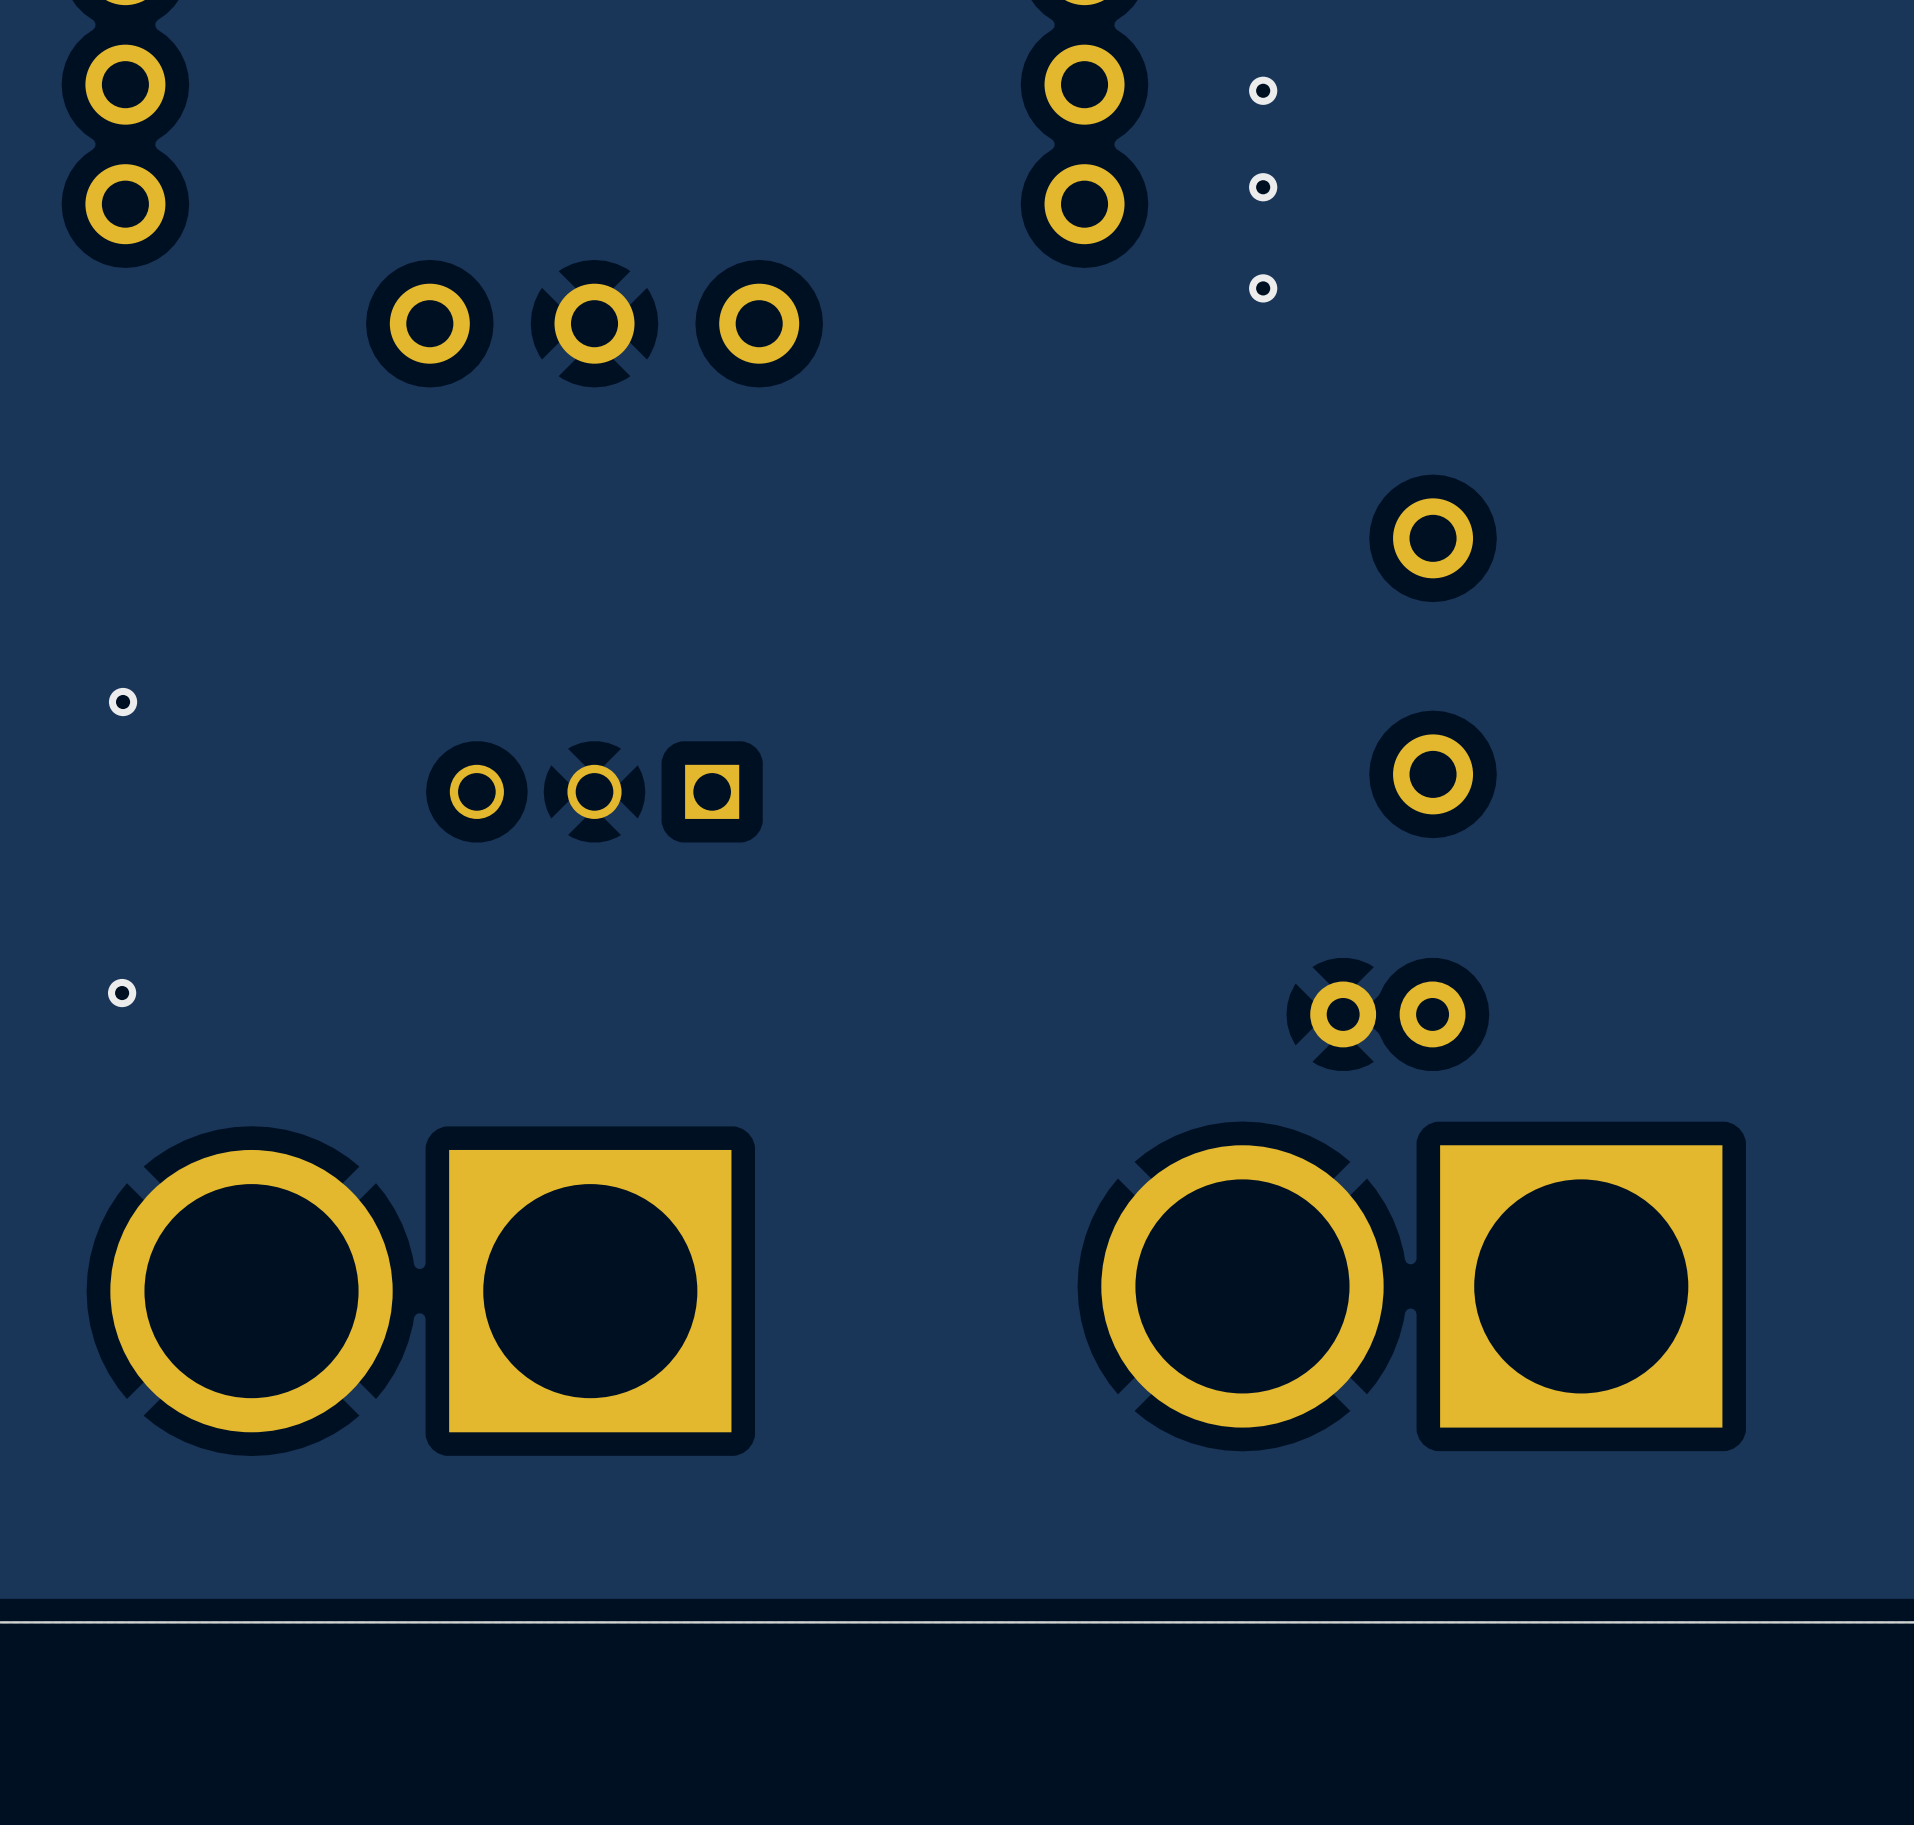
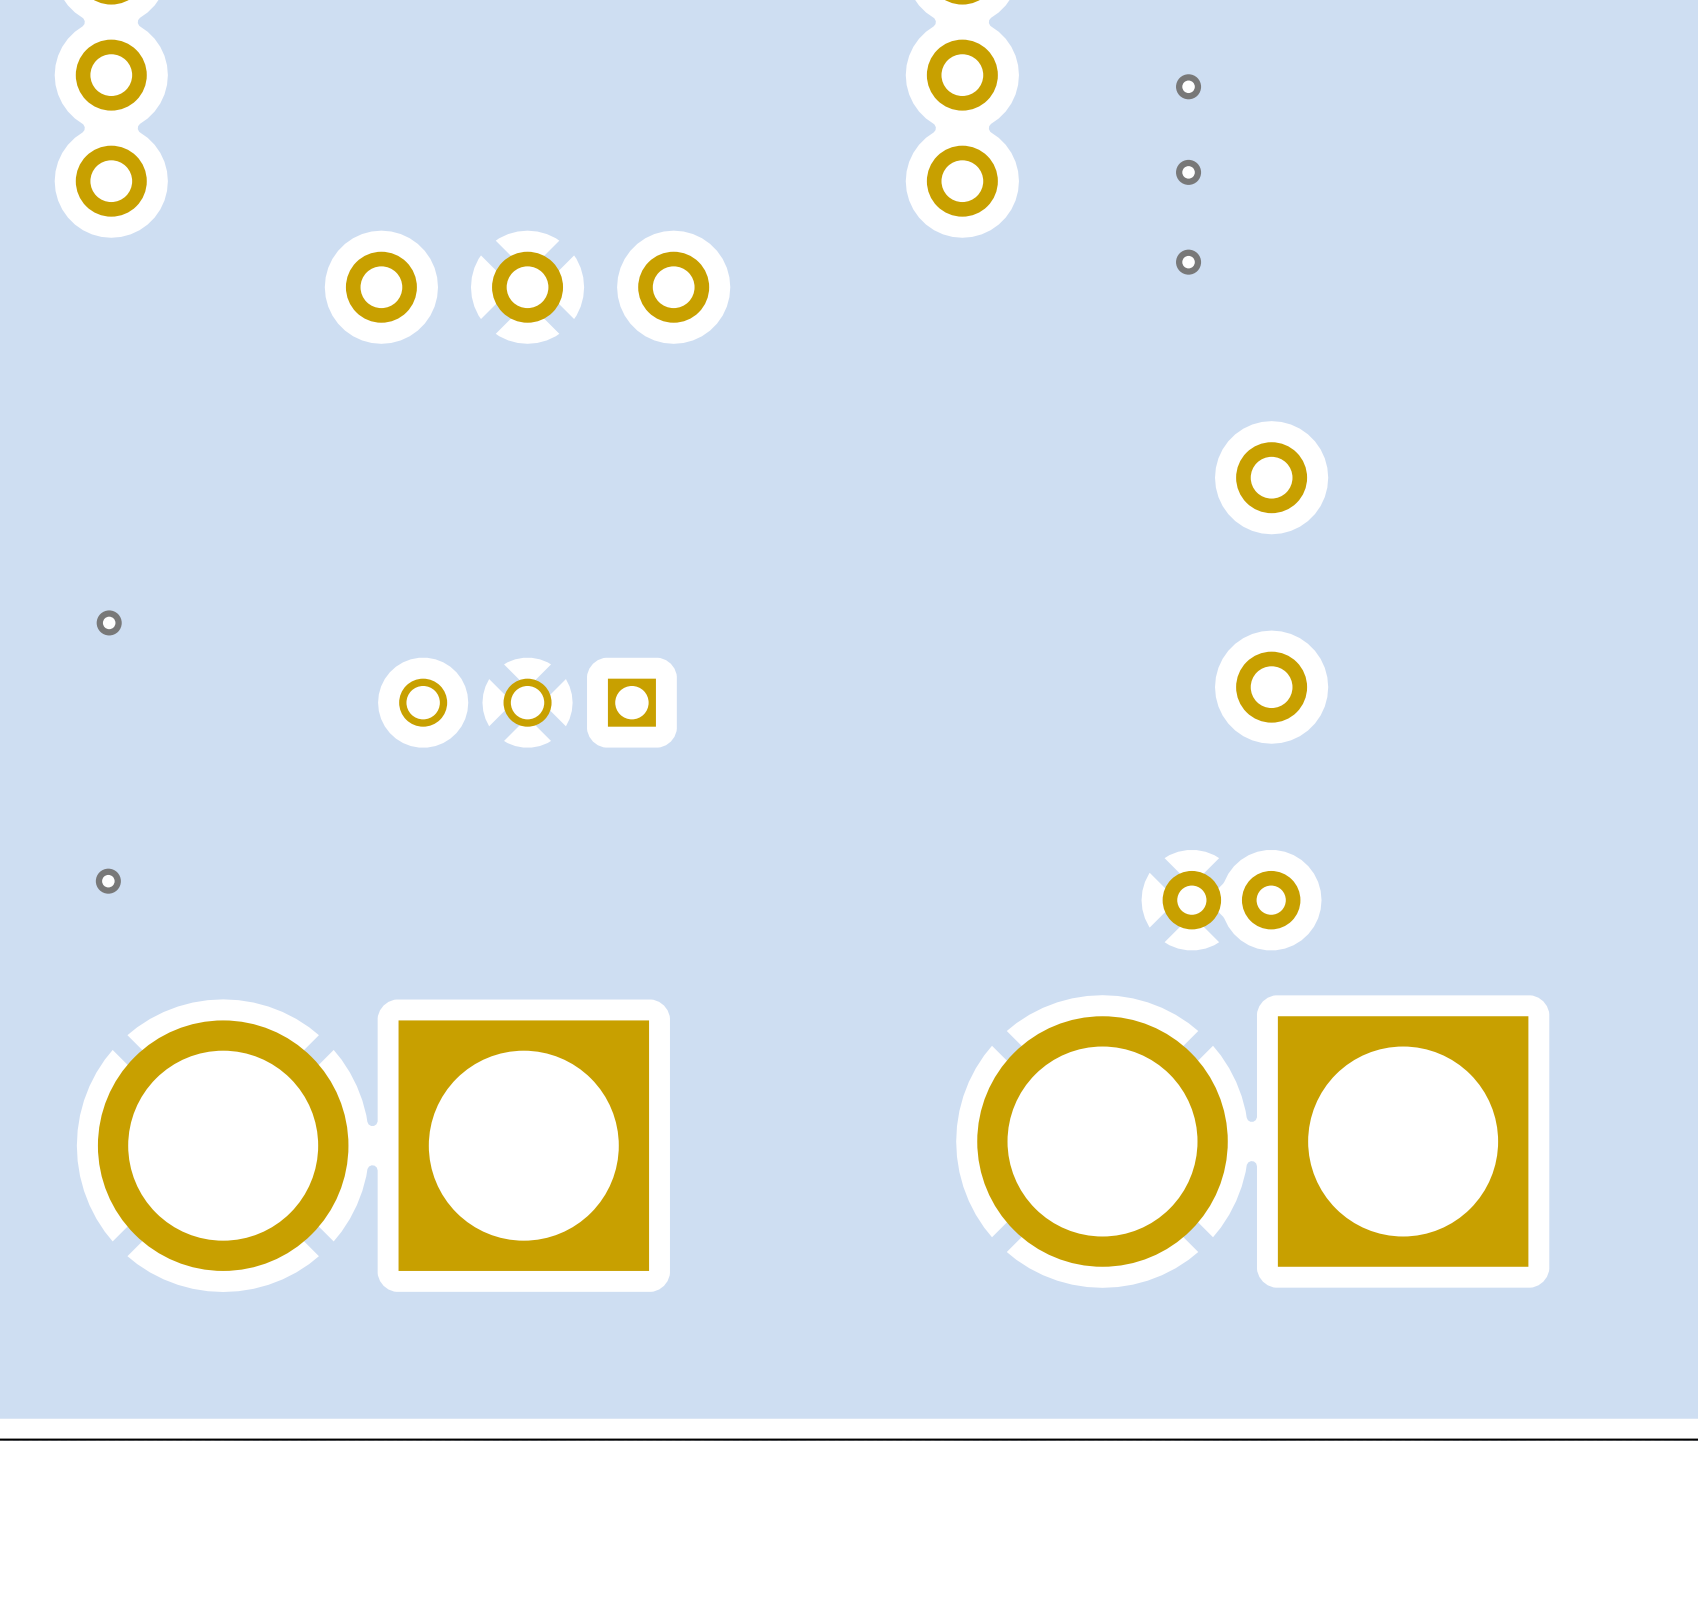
via: (1263, 90) -> none
via: none -> (1188, 86)
via: (1263, 187) -> none
via: none -> (1188, 172)
via: (1263, 288) -> none
via: none -> (1188, 262)

